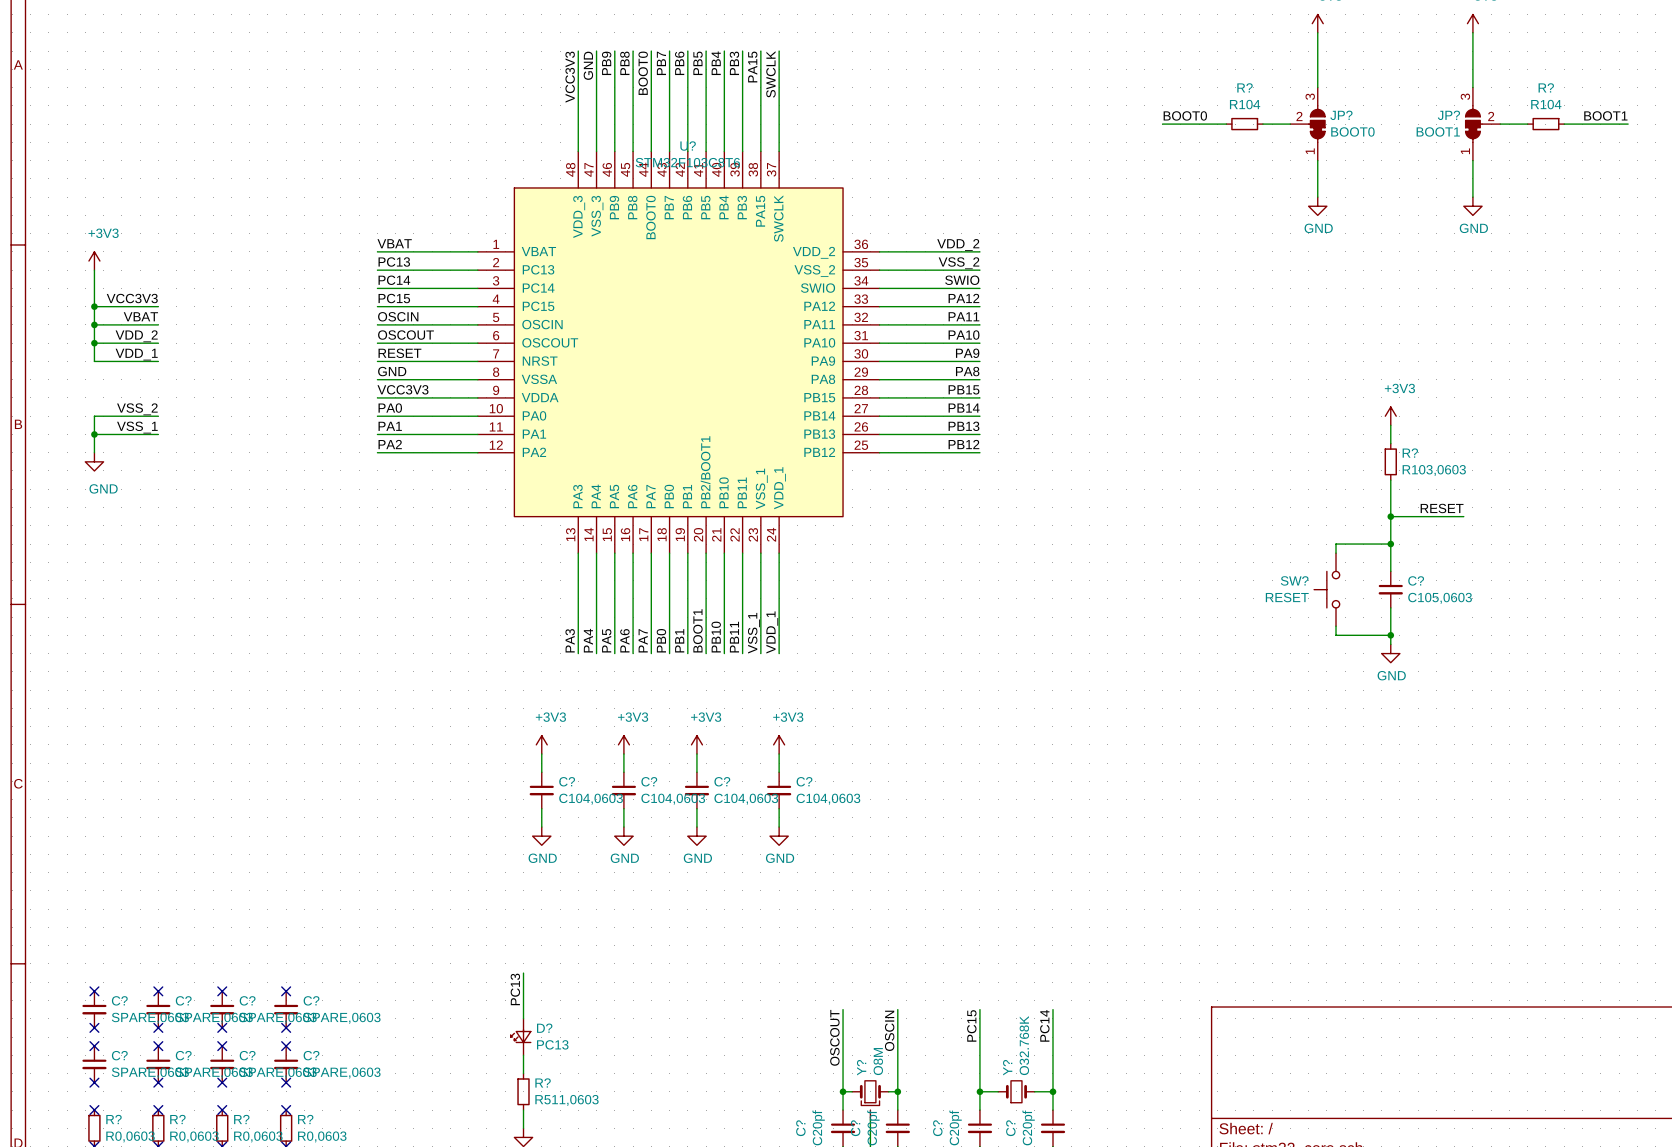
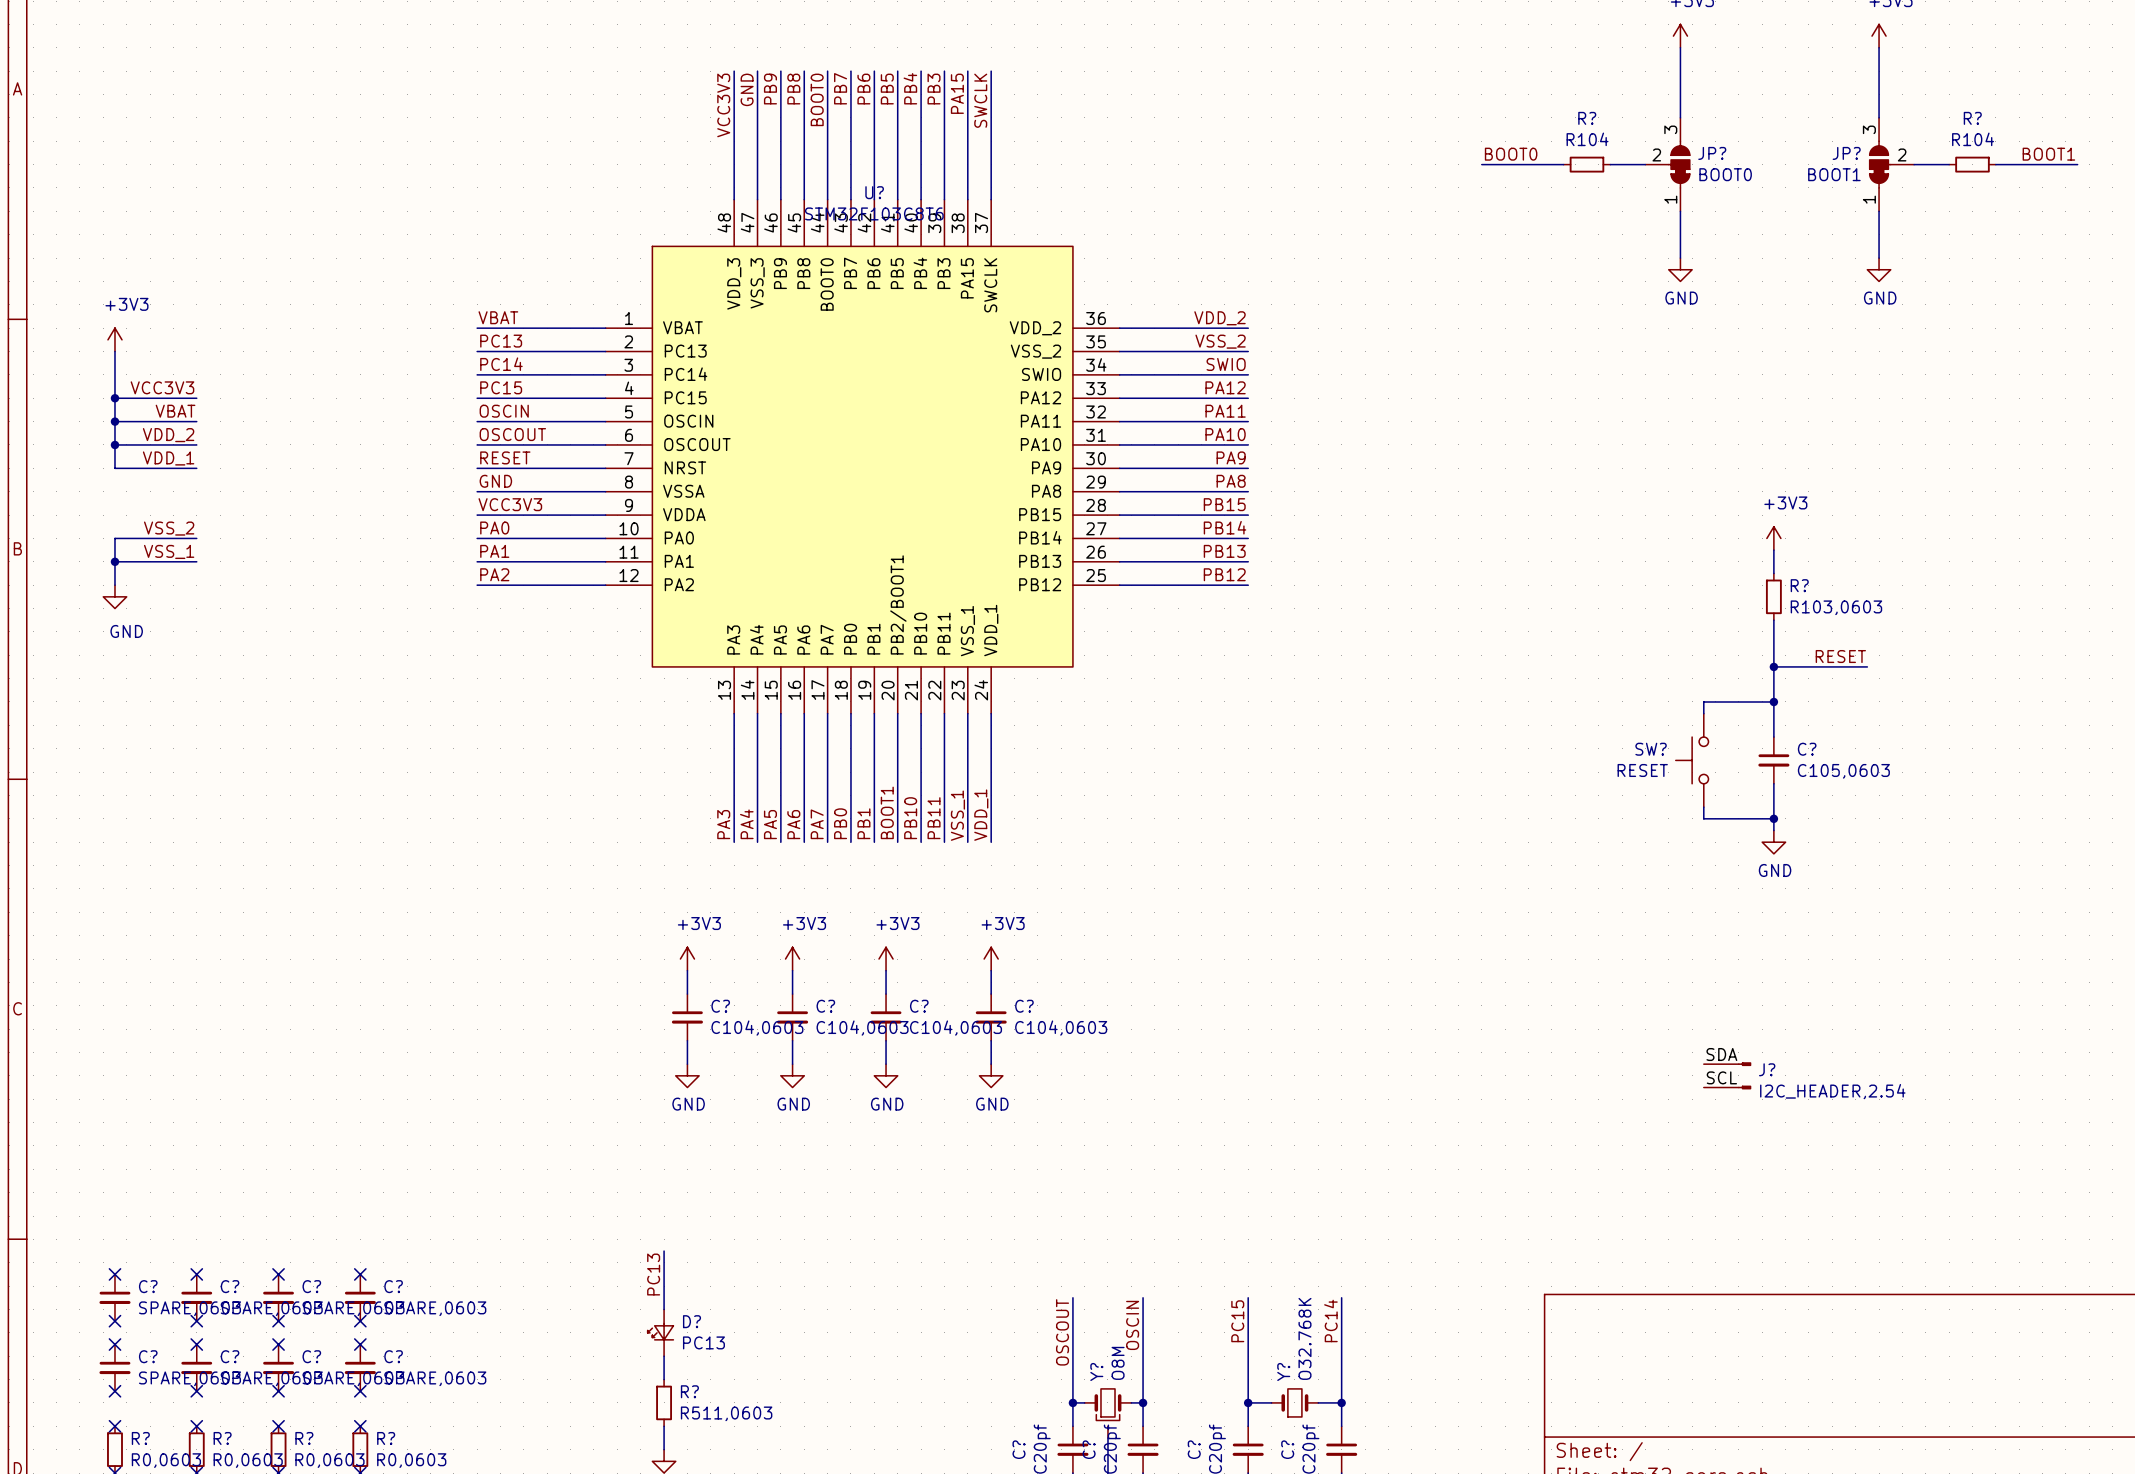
J?: none -> I2C_HEADER,2.54 (1727, 1075)

